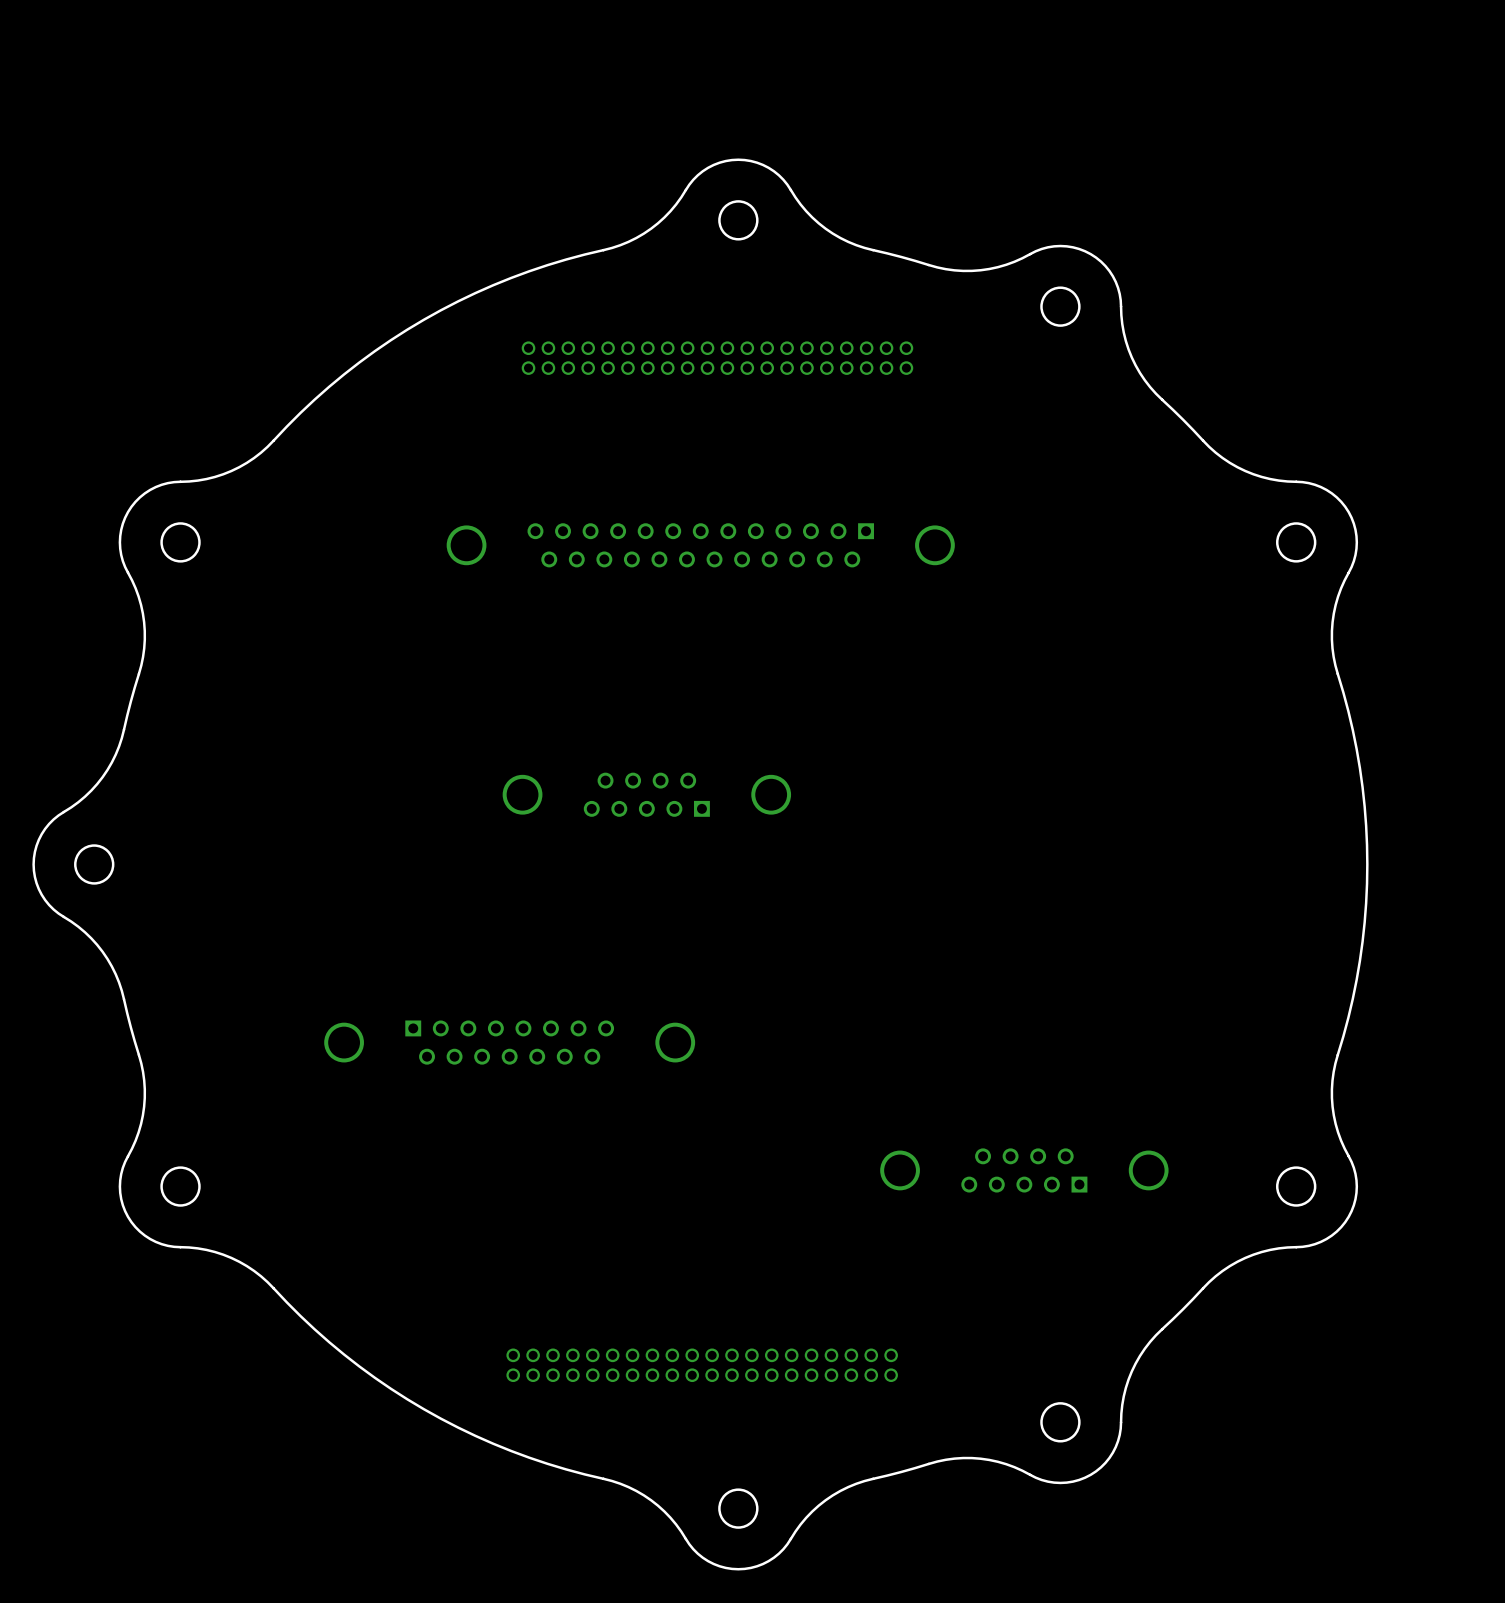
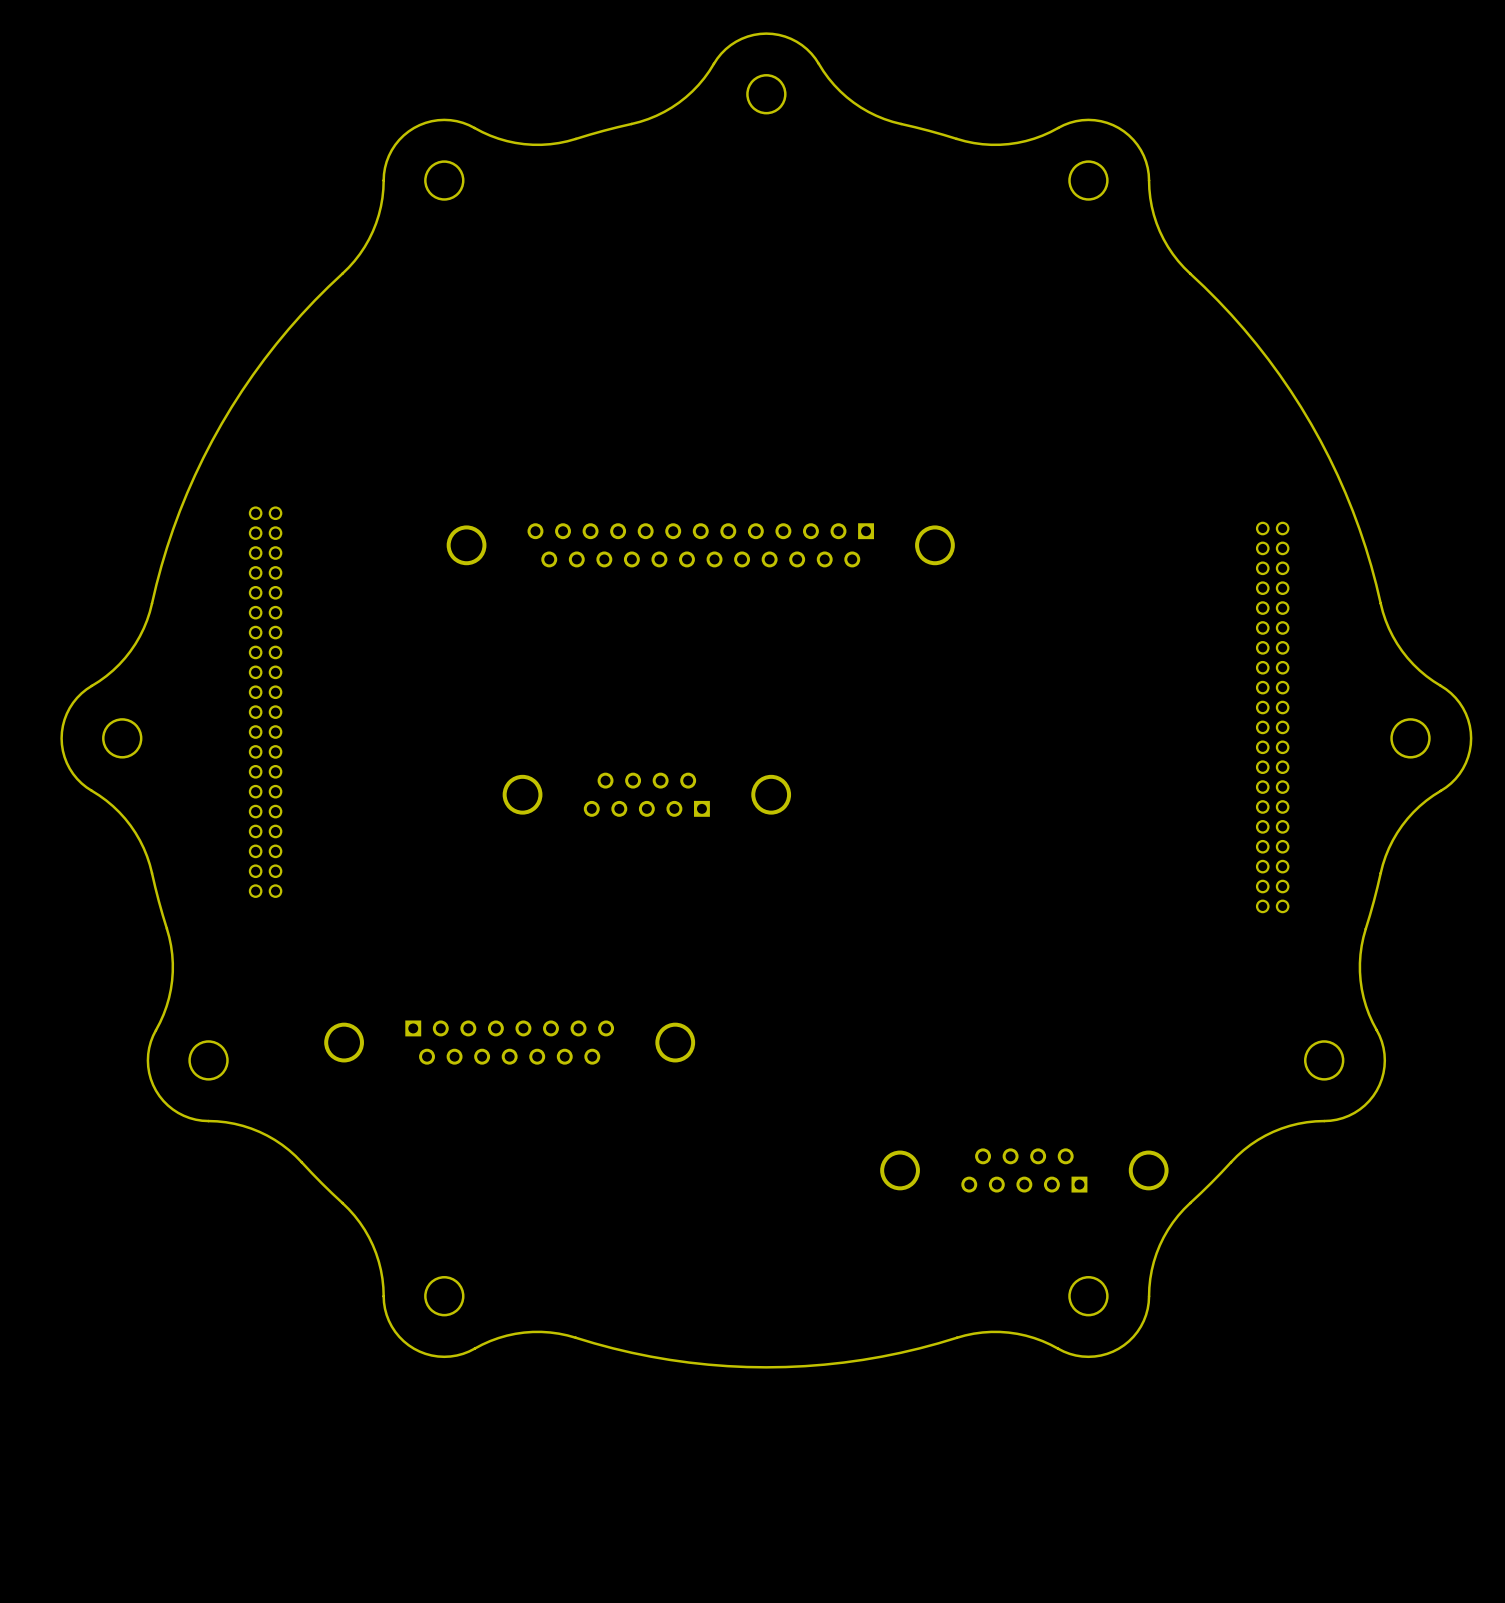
part rotation: 0° (700, 864) -> 90° clockwise (766, 700)

